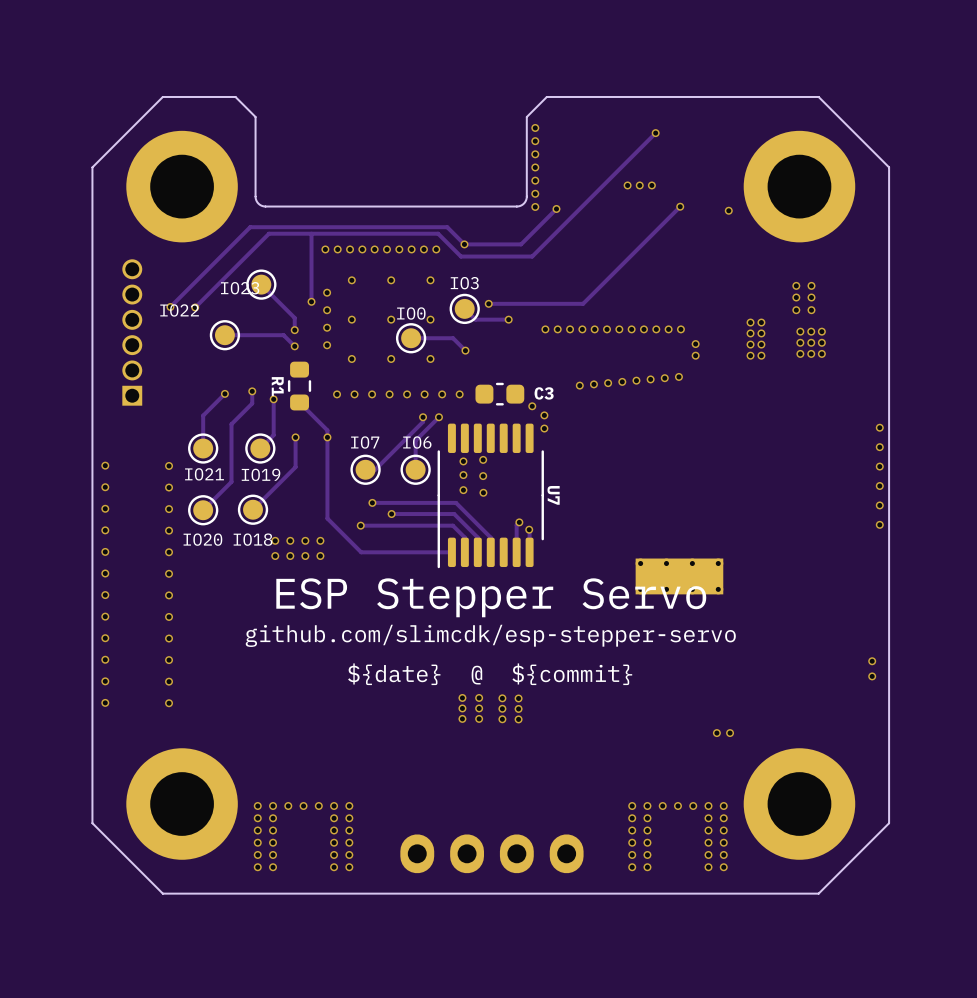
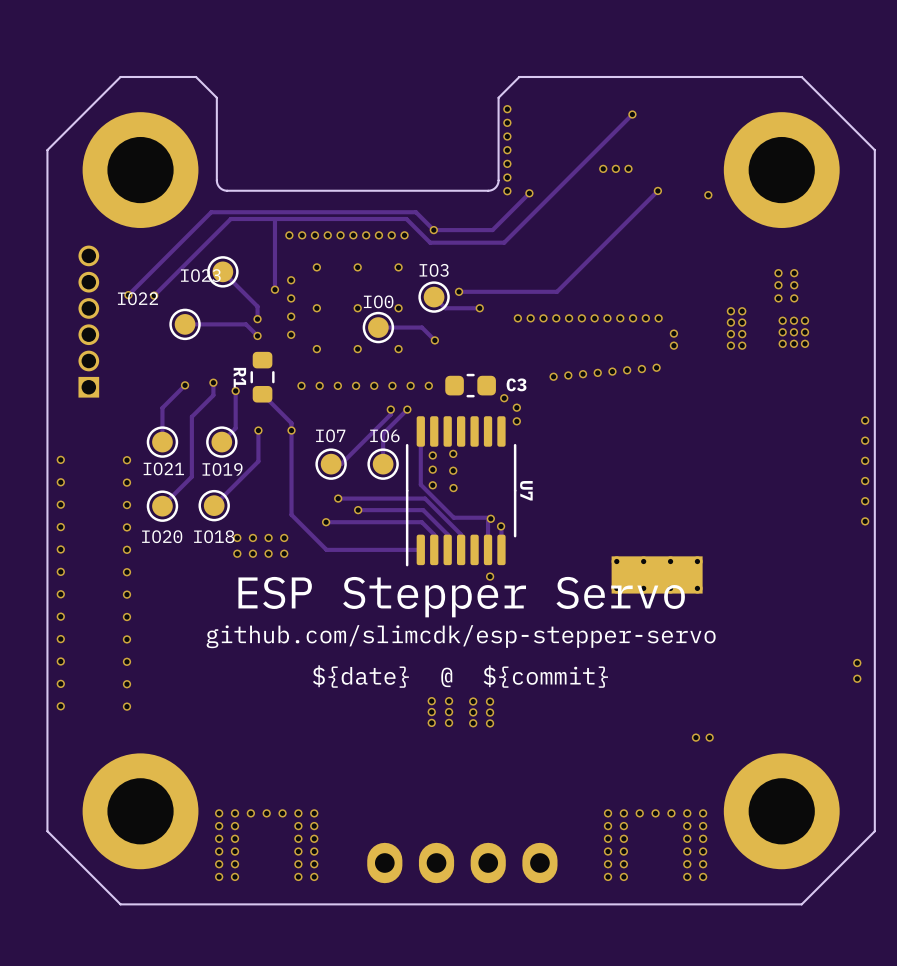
track: none -> (420, 431) (420, 484) (453, 517) (489, 517)
via: none -> (490, 576)

